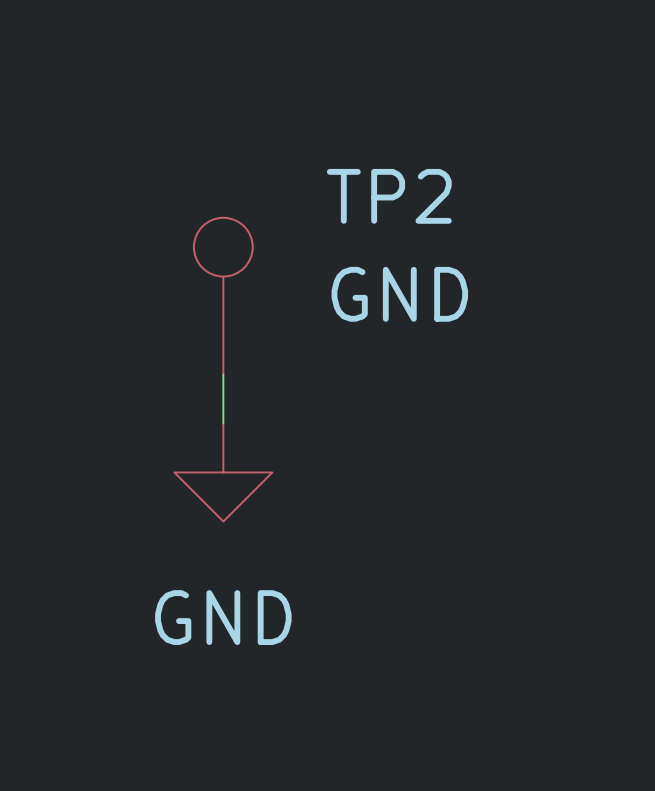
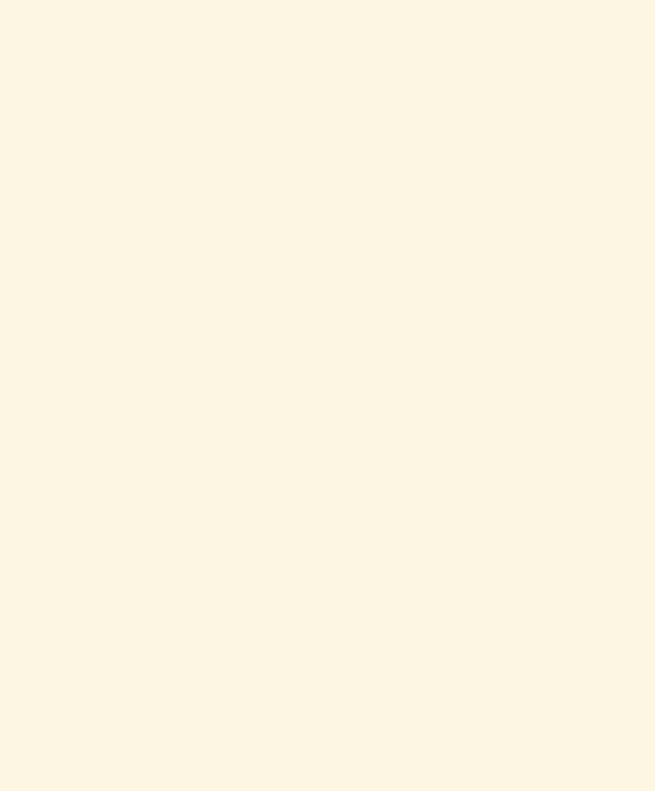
TP2: GND (223, 296) -> none
wire: (223, 374) (223, 423) -> none
power symbol: GND (223, 472) -> none

